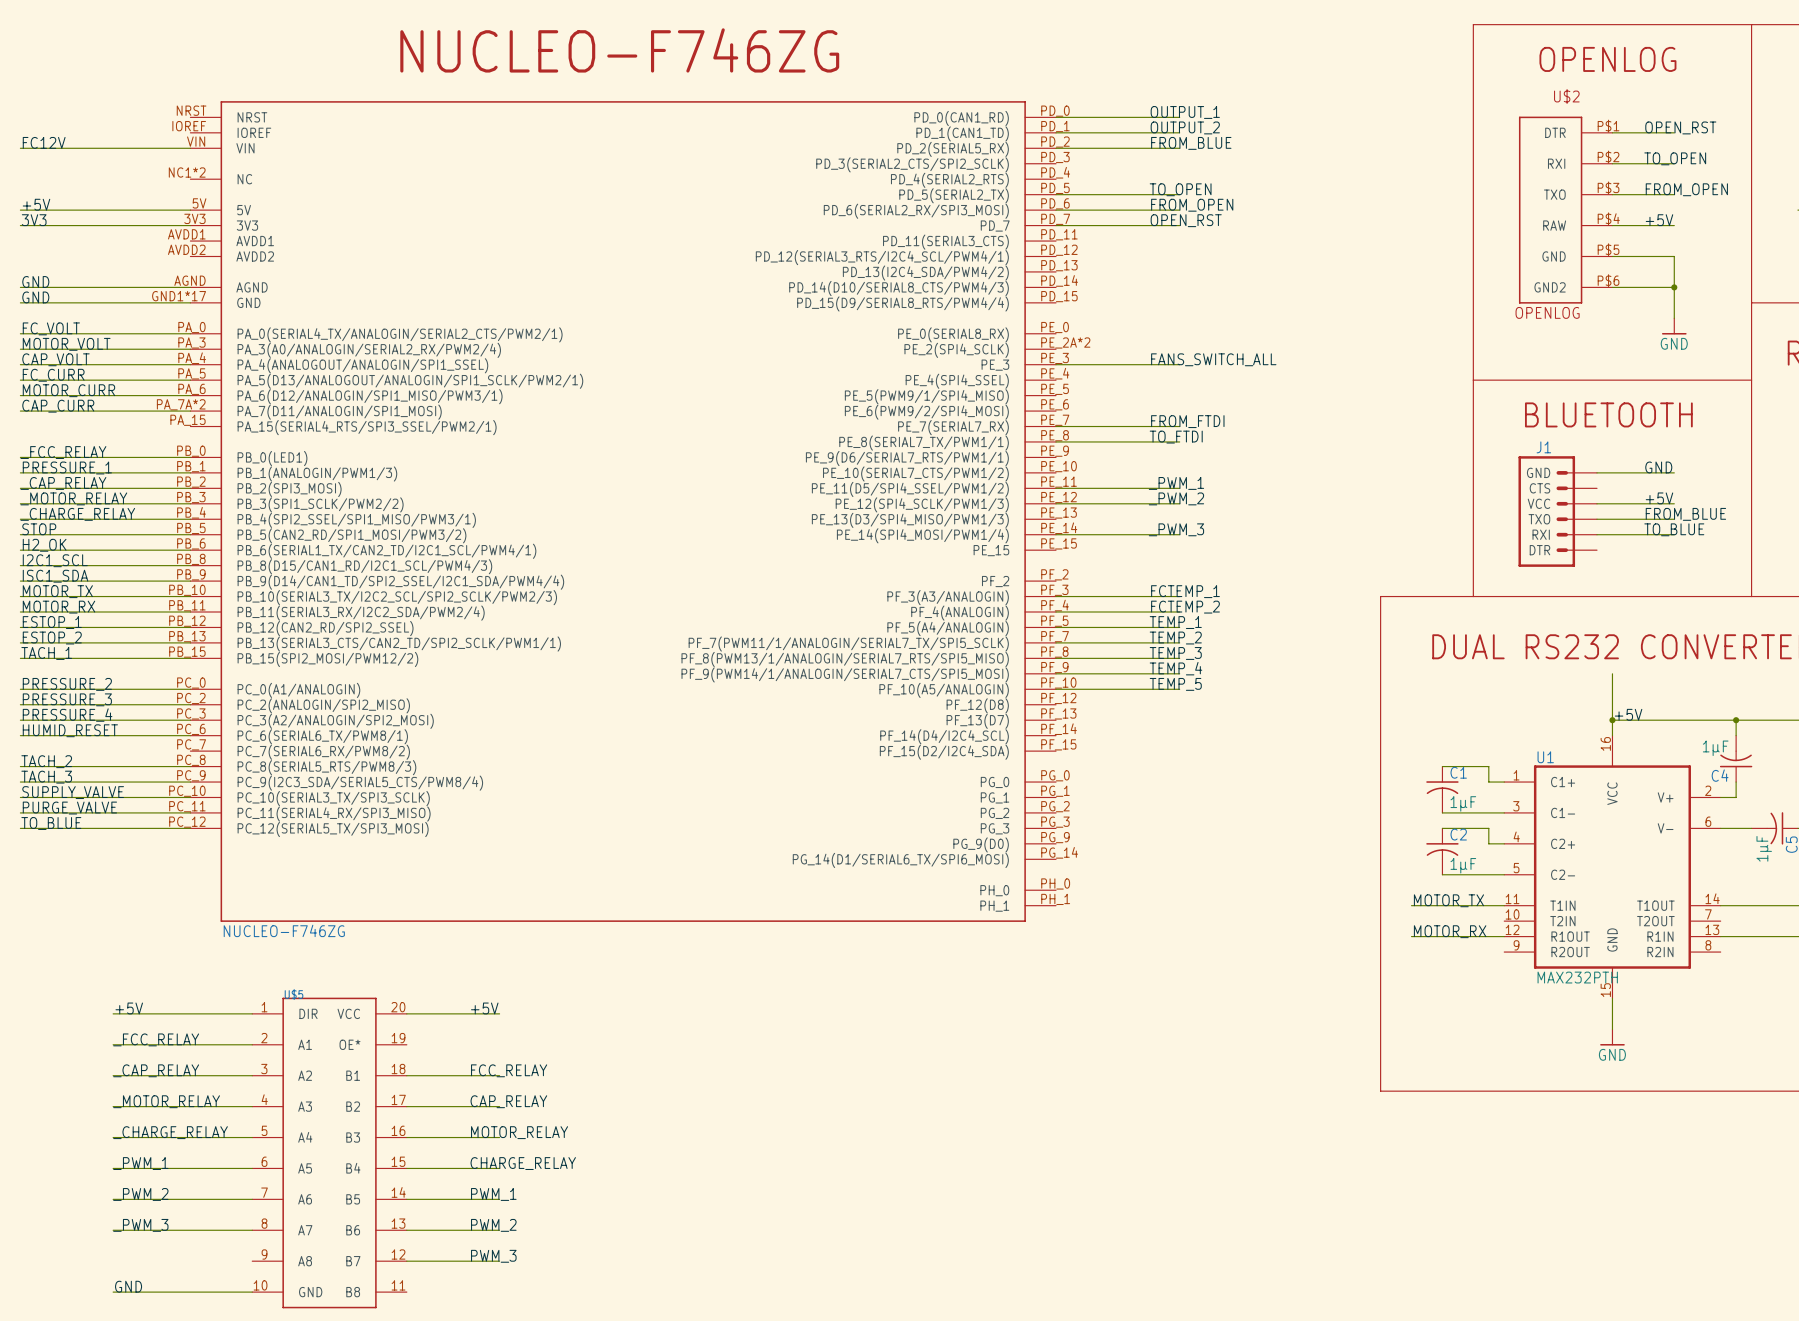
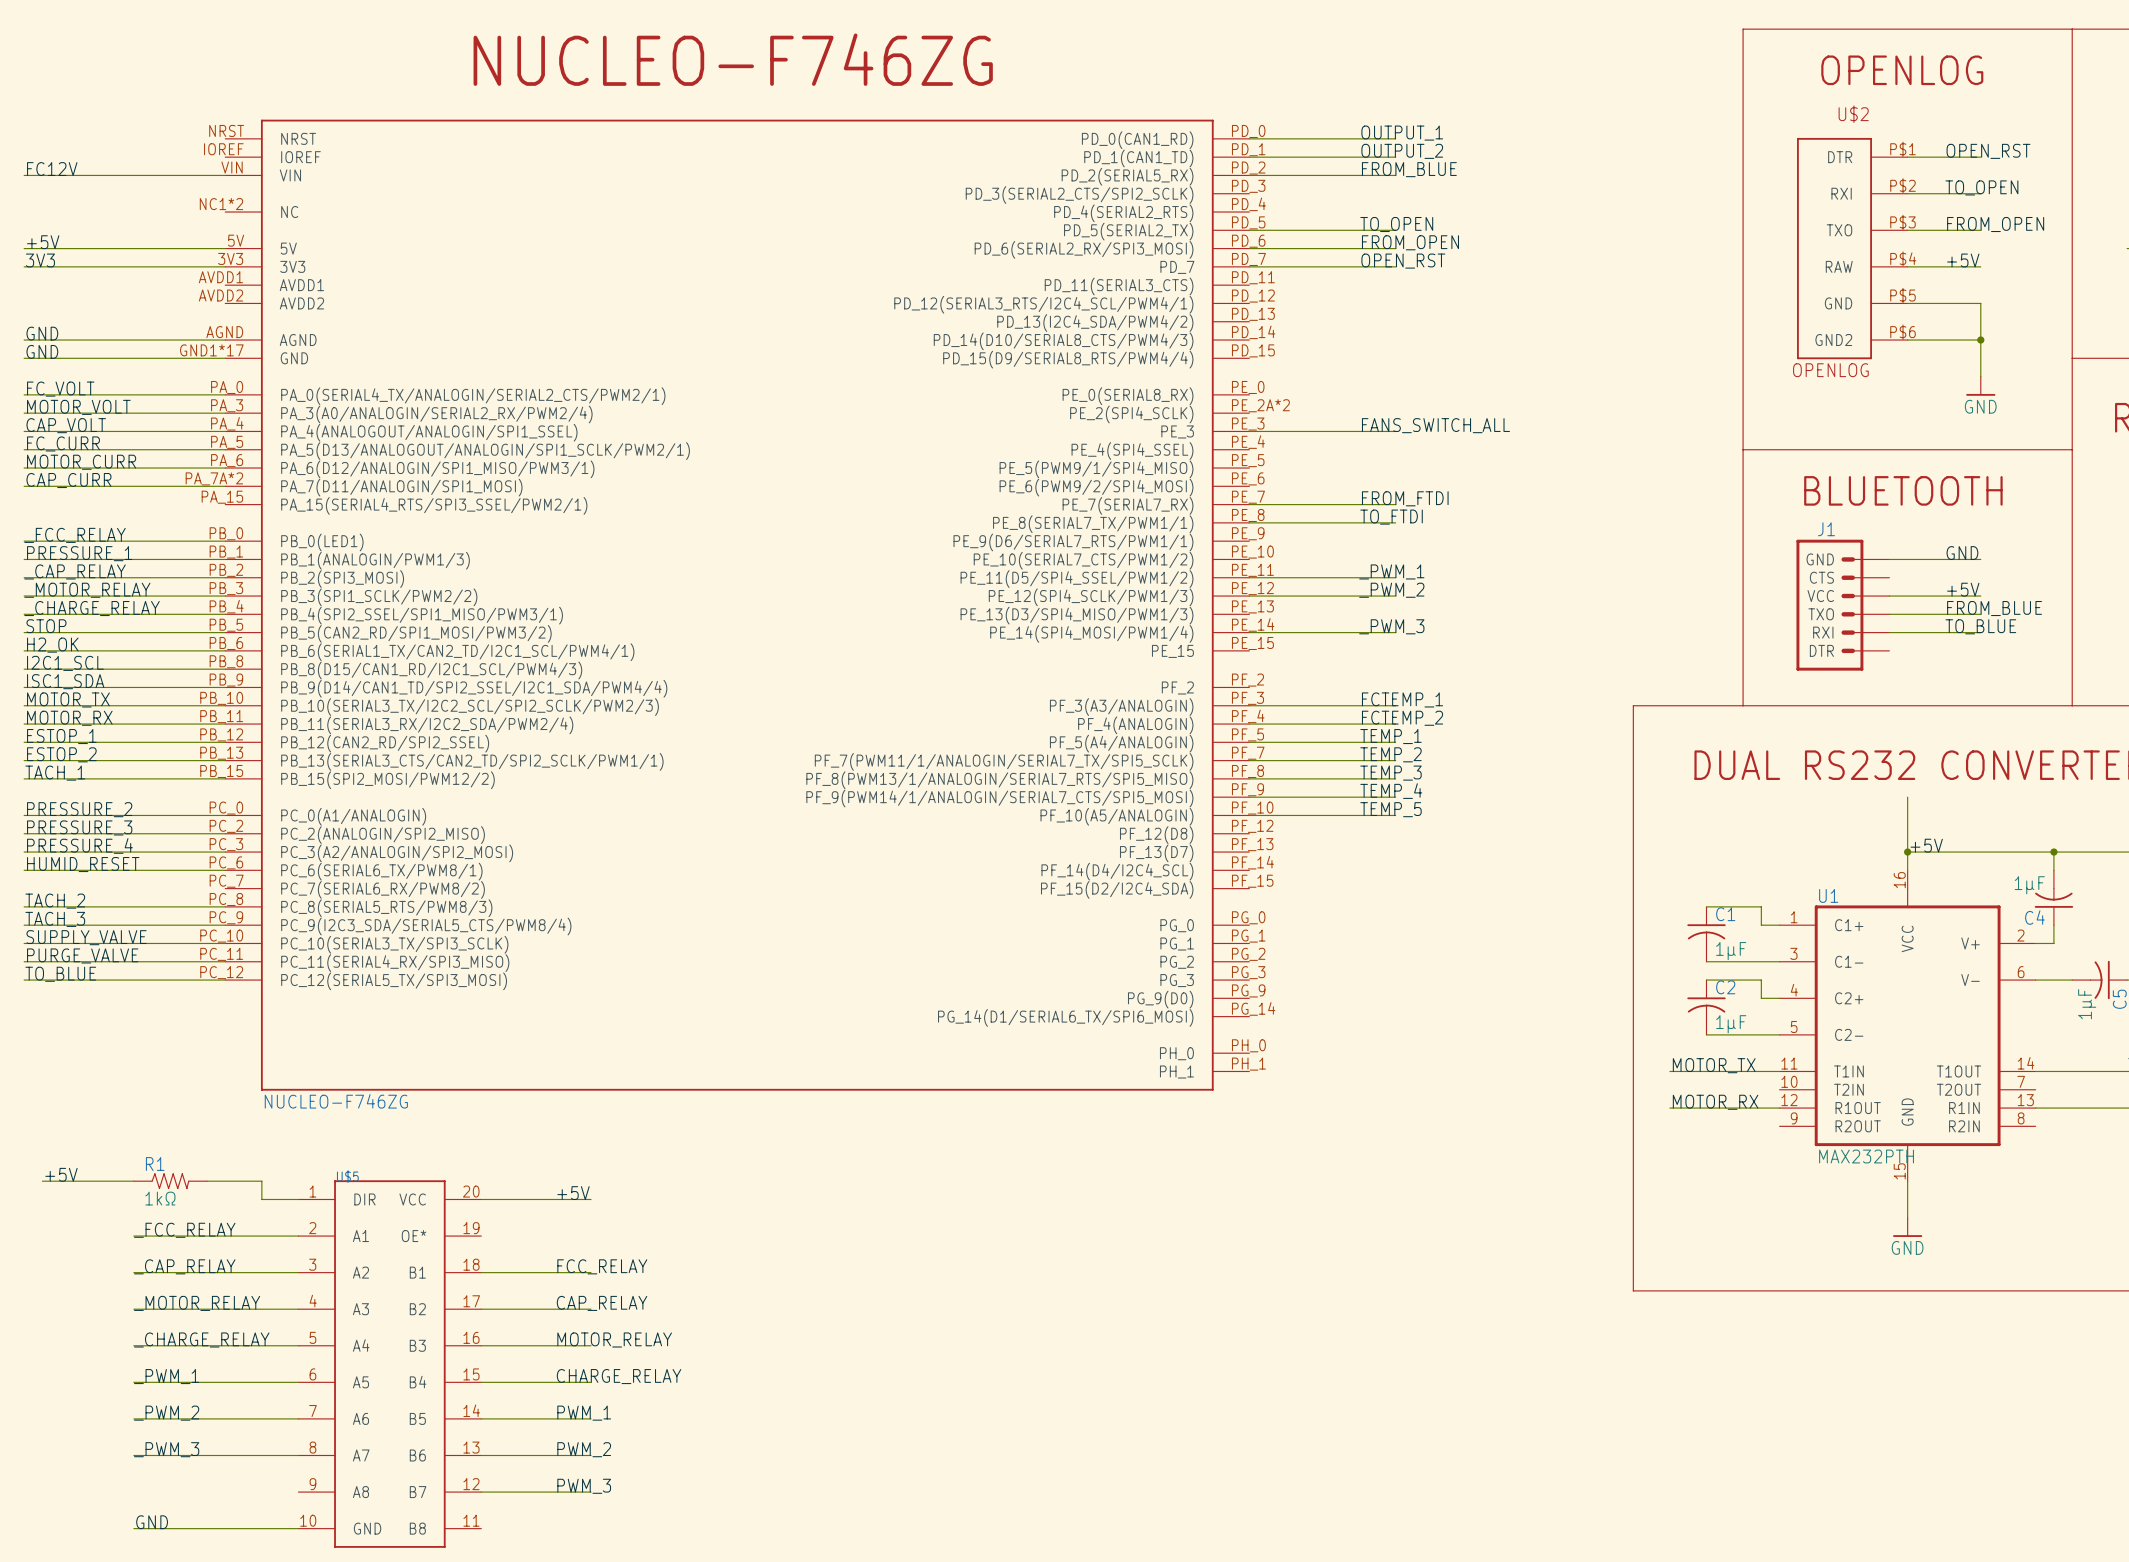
wire: none -> (42, 1181) (133, 1181)
R1: none -> 1kΩ (170, 1181)
label position: +5V (129, 1008) -> +5V (61, 1174)
wire: (113, 1013) (221, 1013) -> (207, 1181) (261, 1181) (261, 1199)

